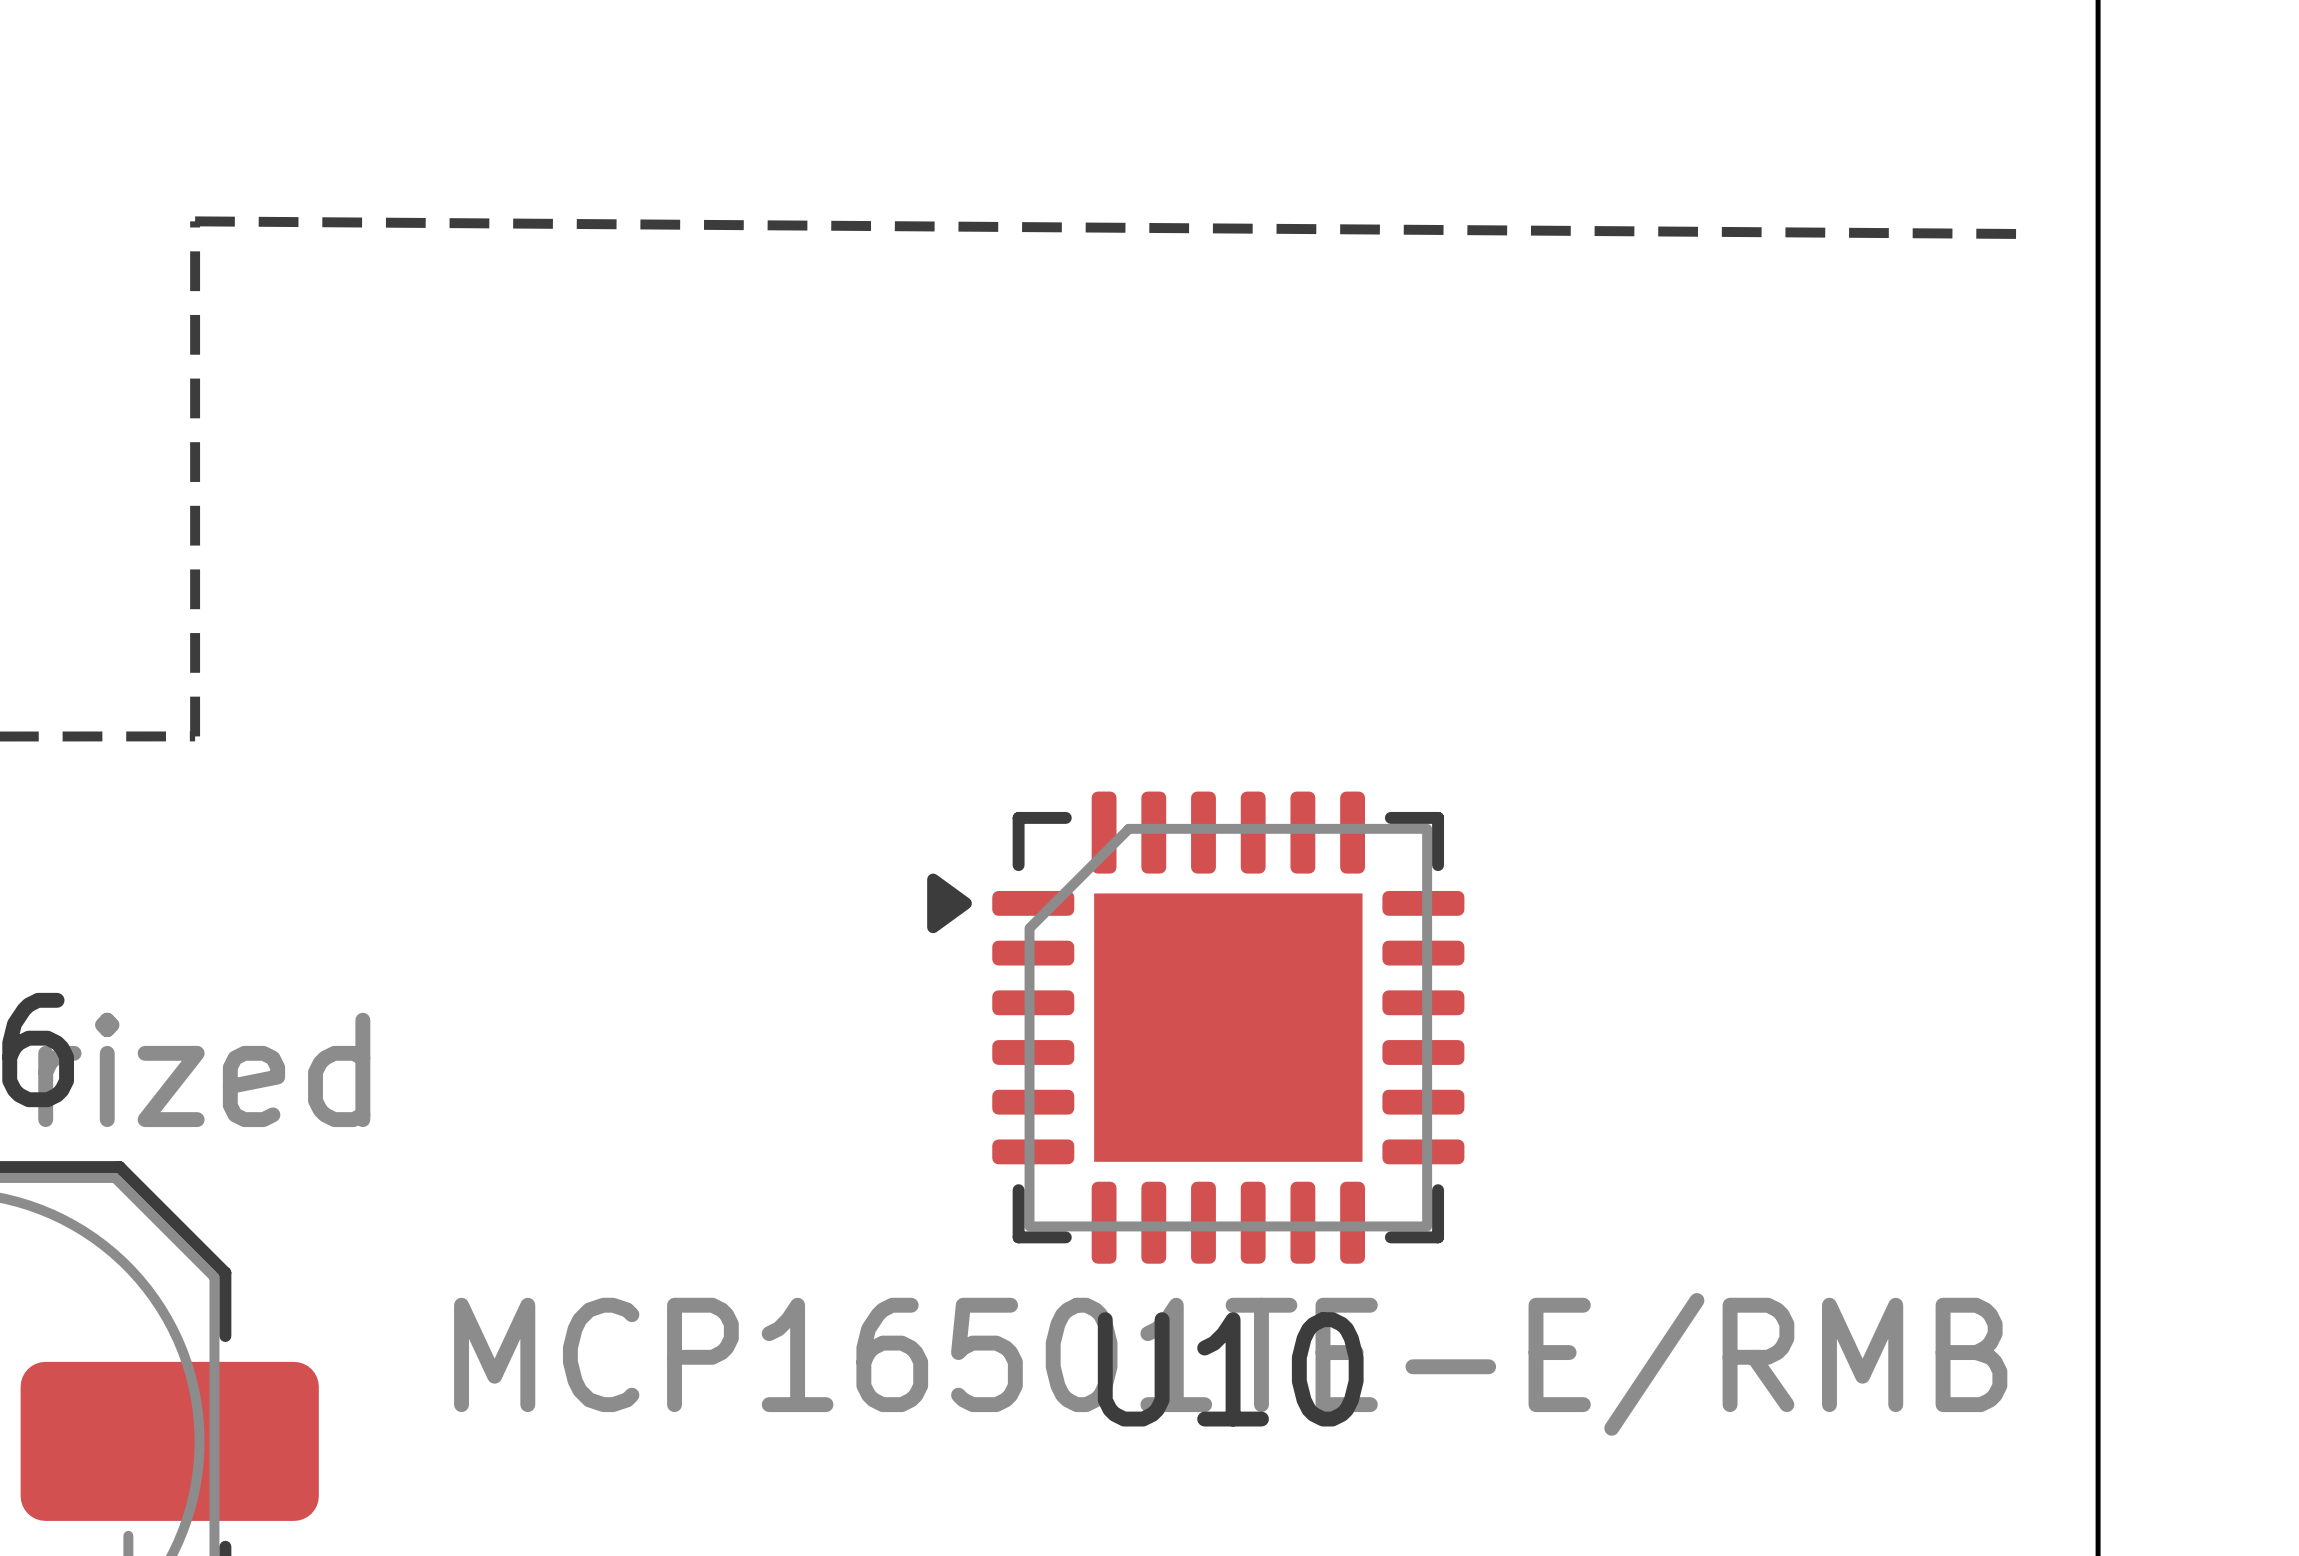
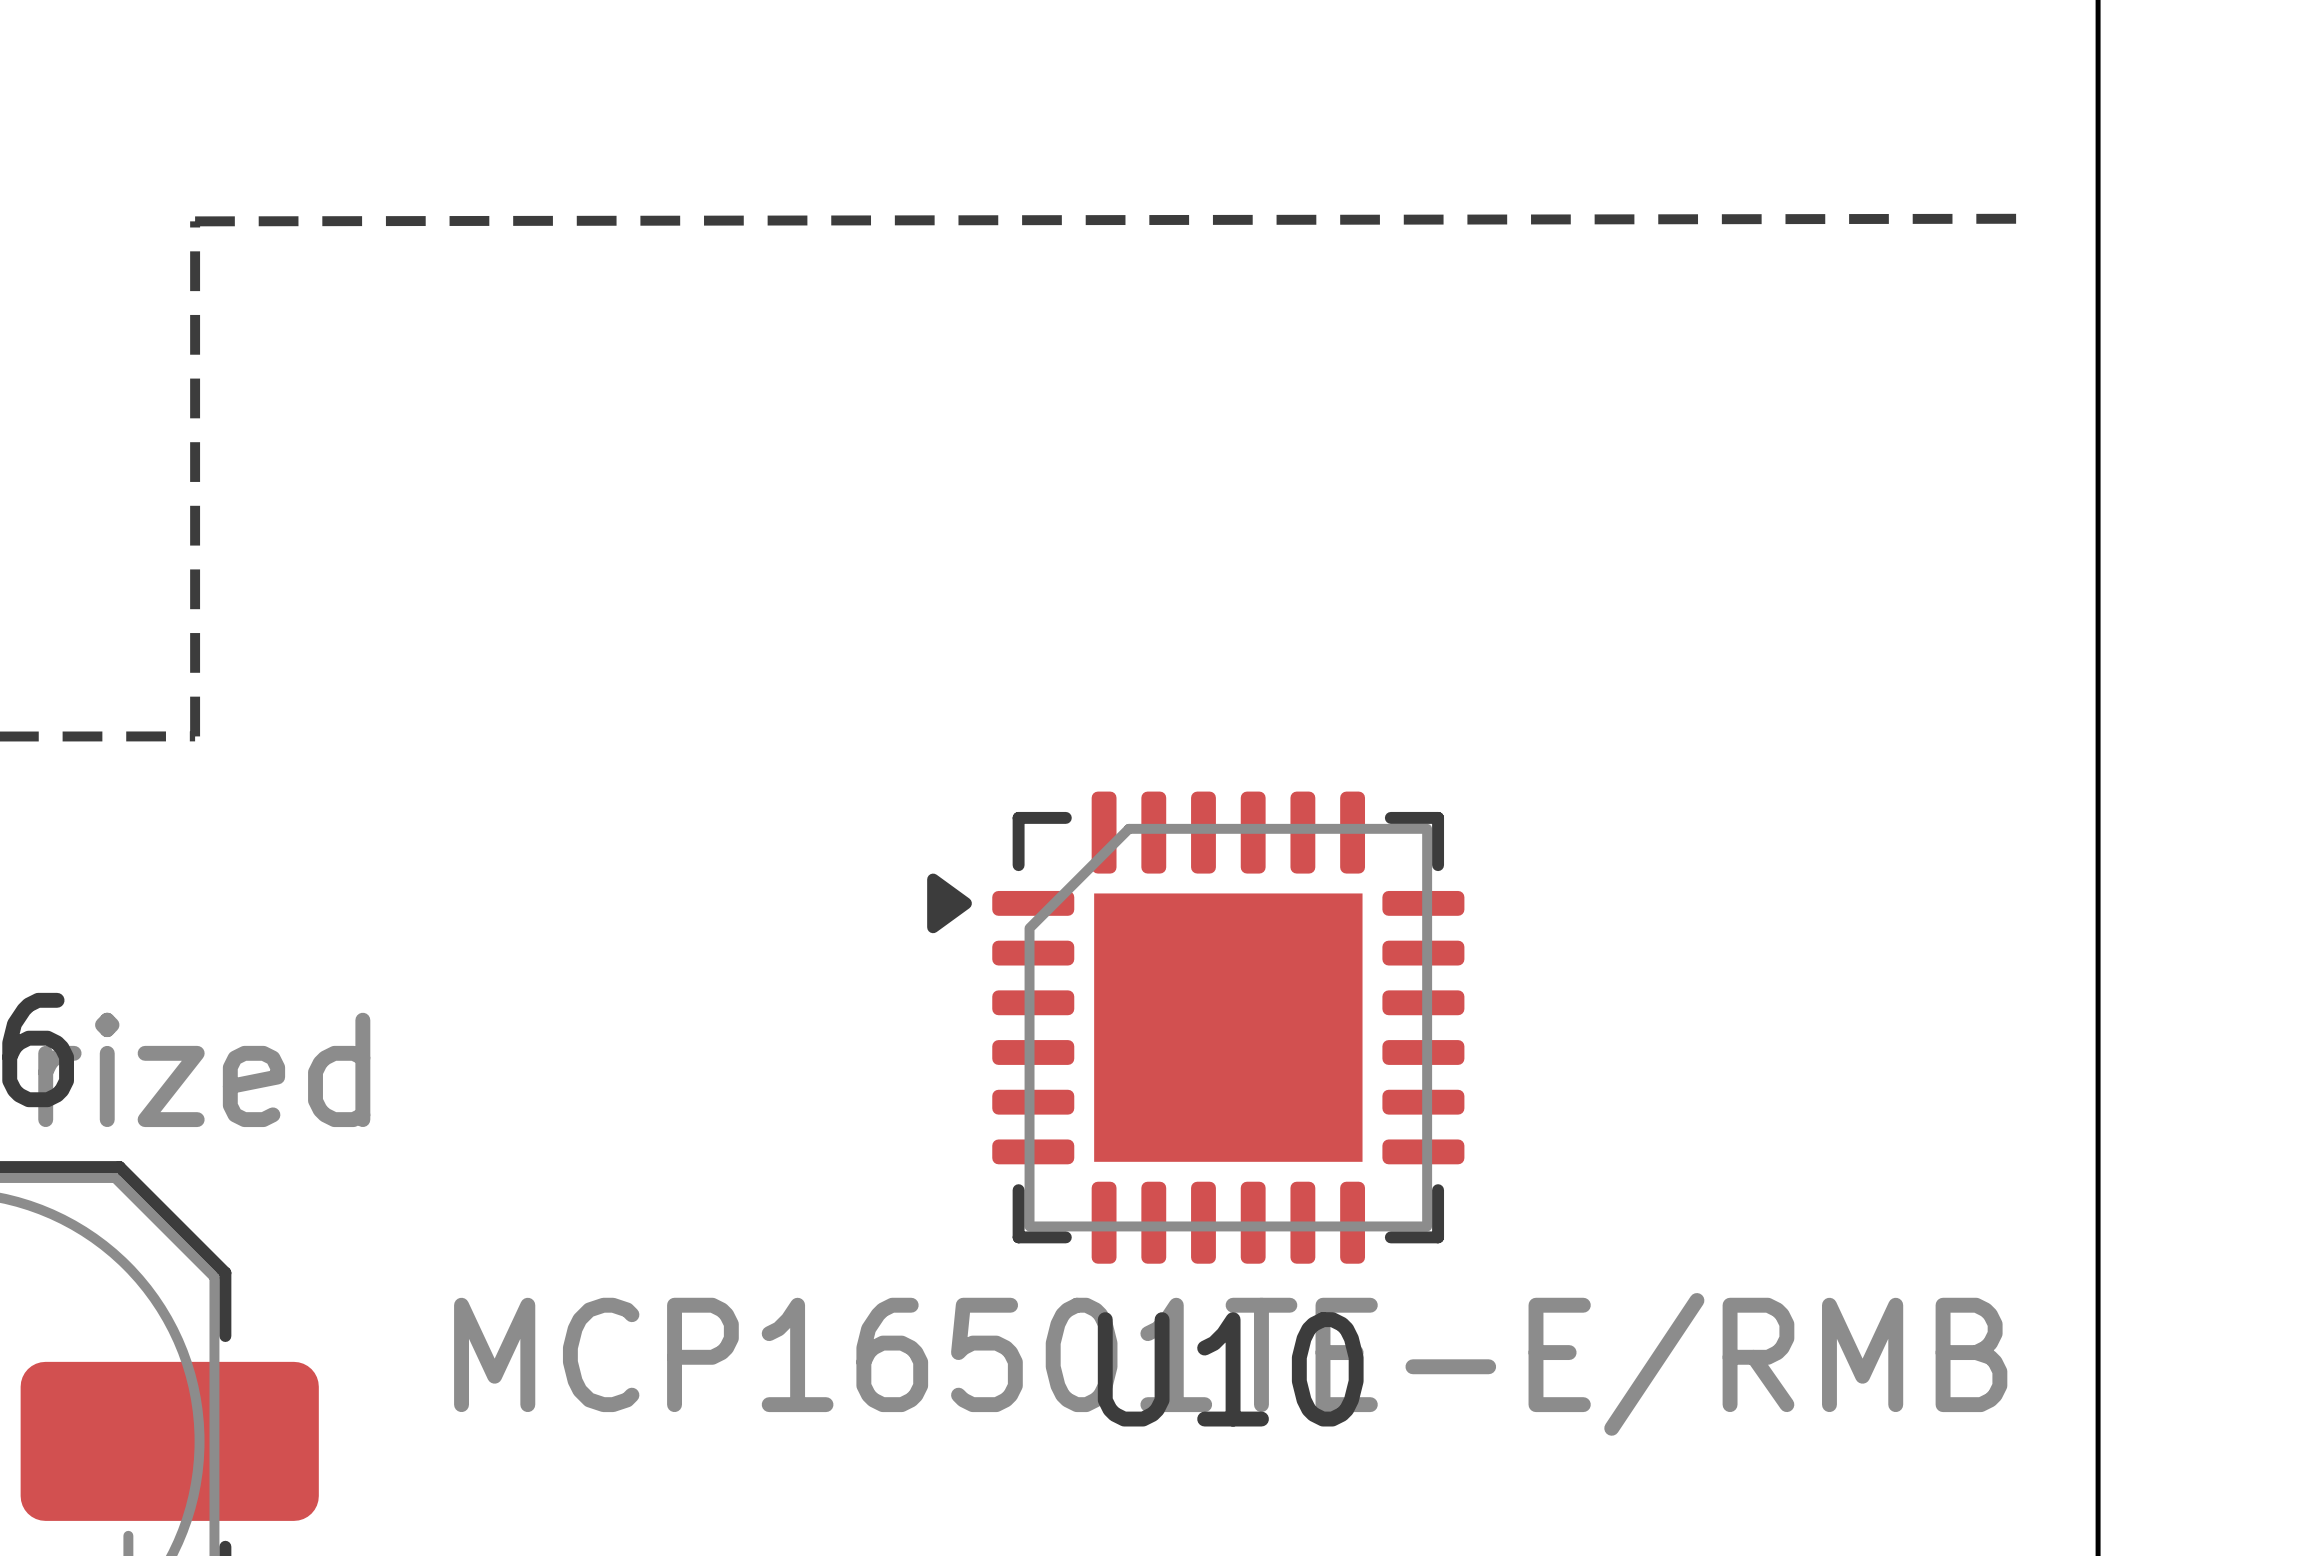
line: (195, 221) (2017, 233) -> (195, 221) (2017, 218)

